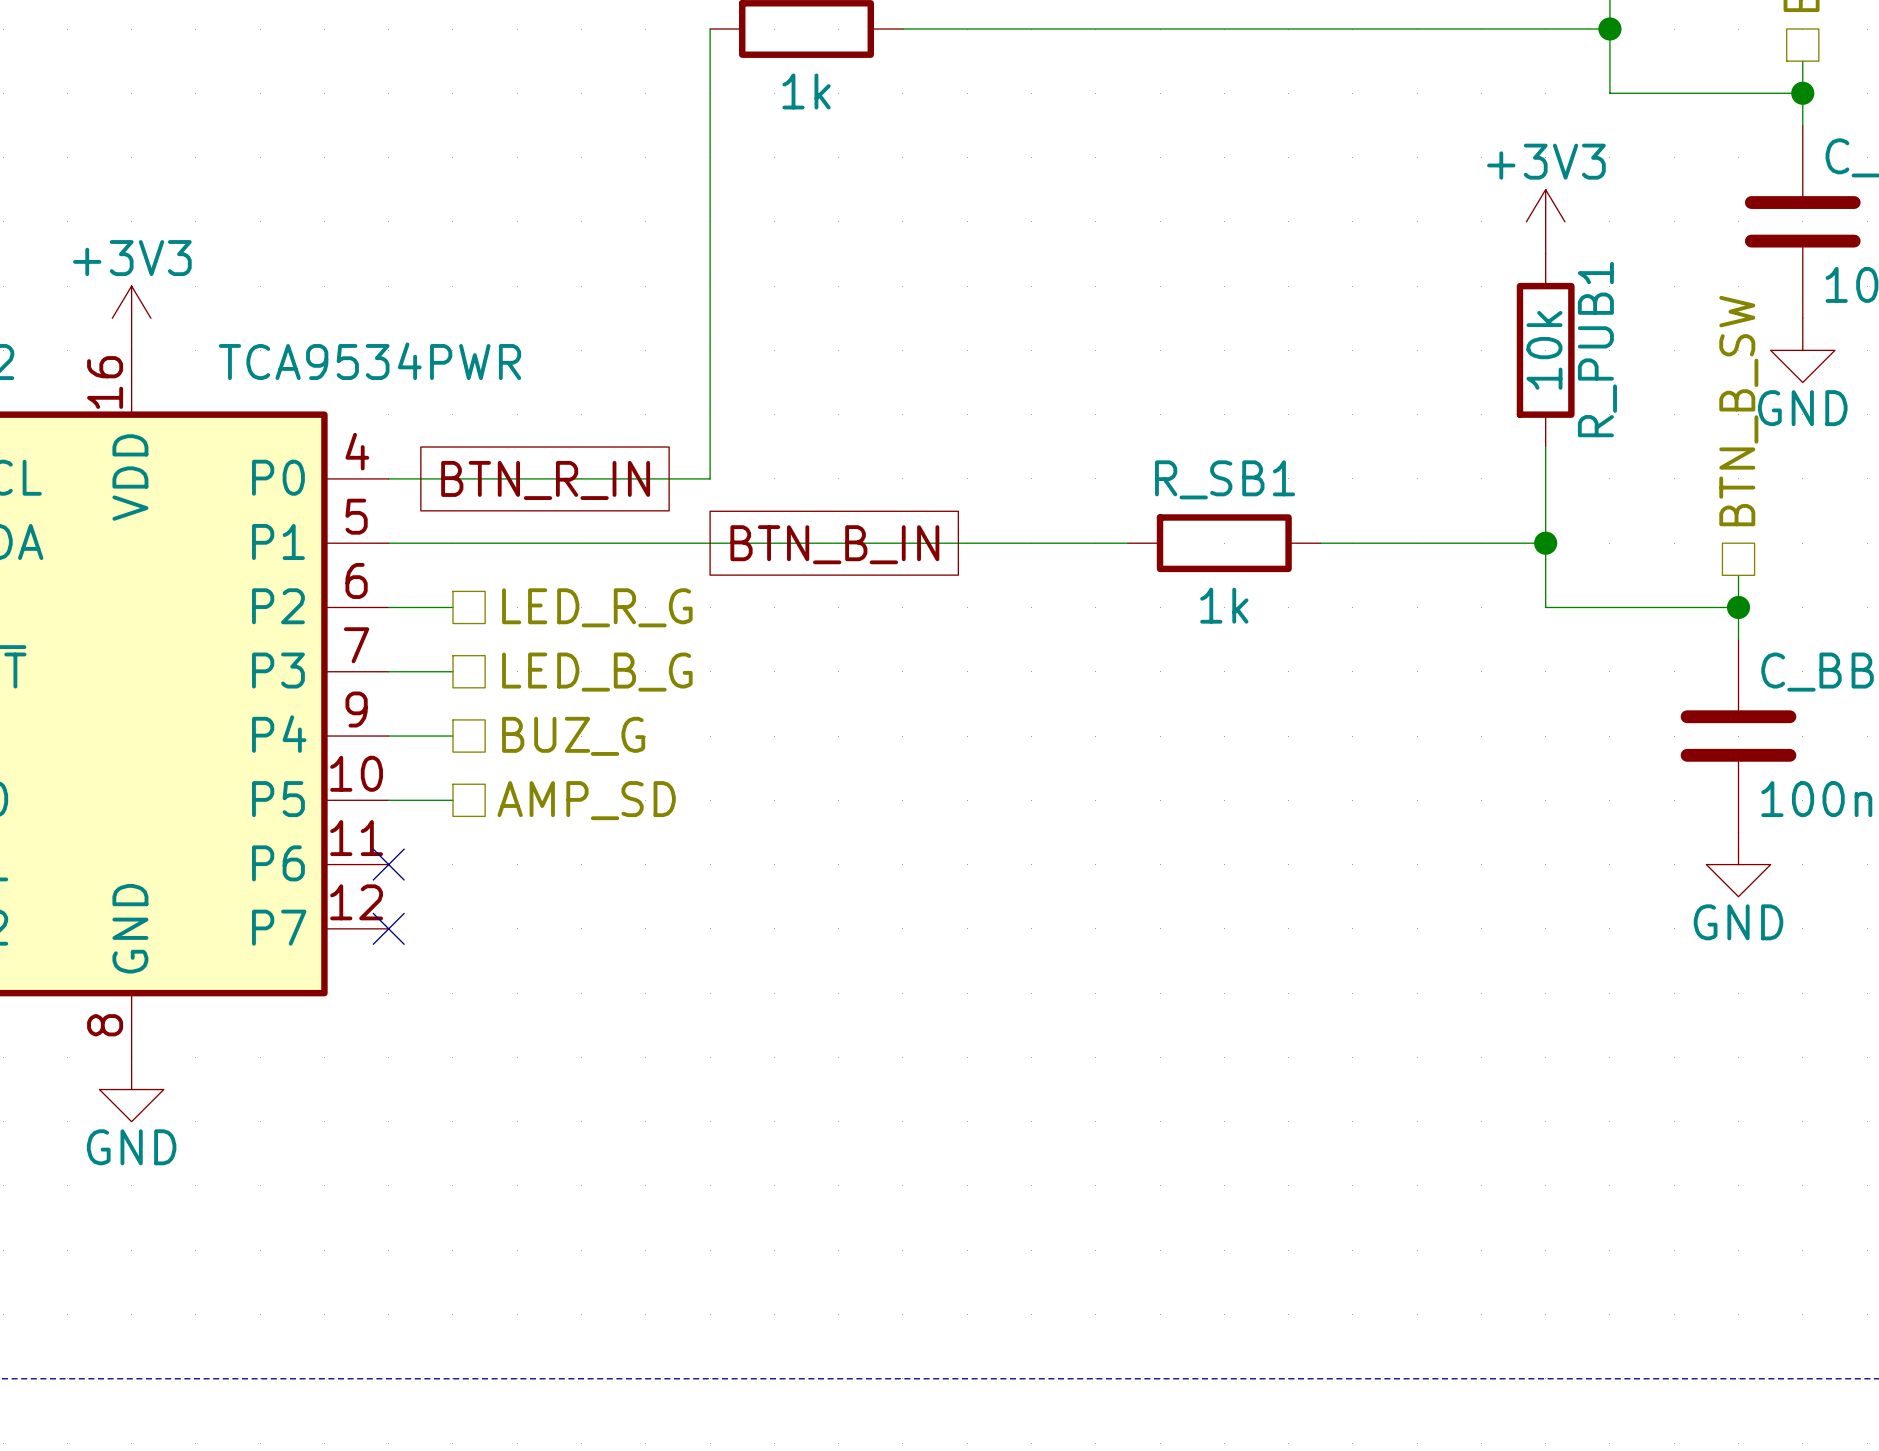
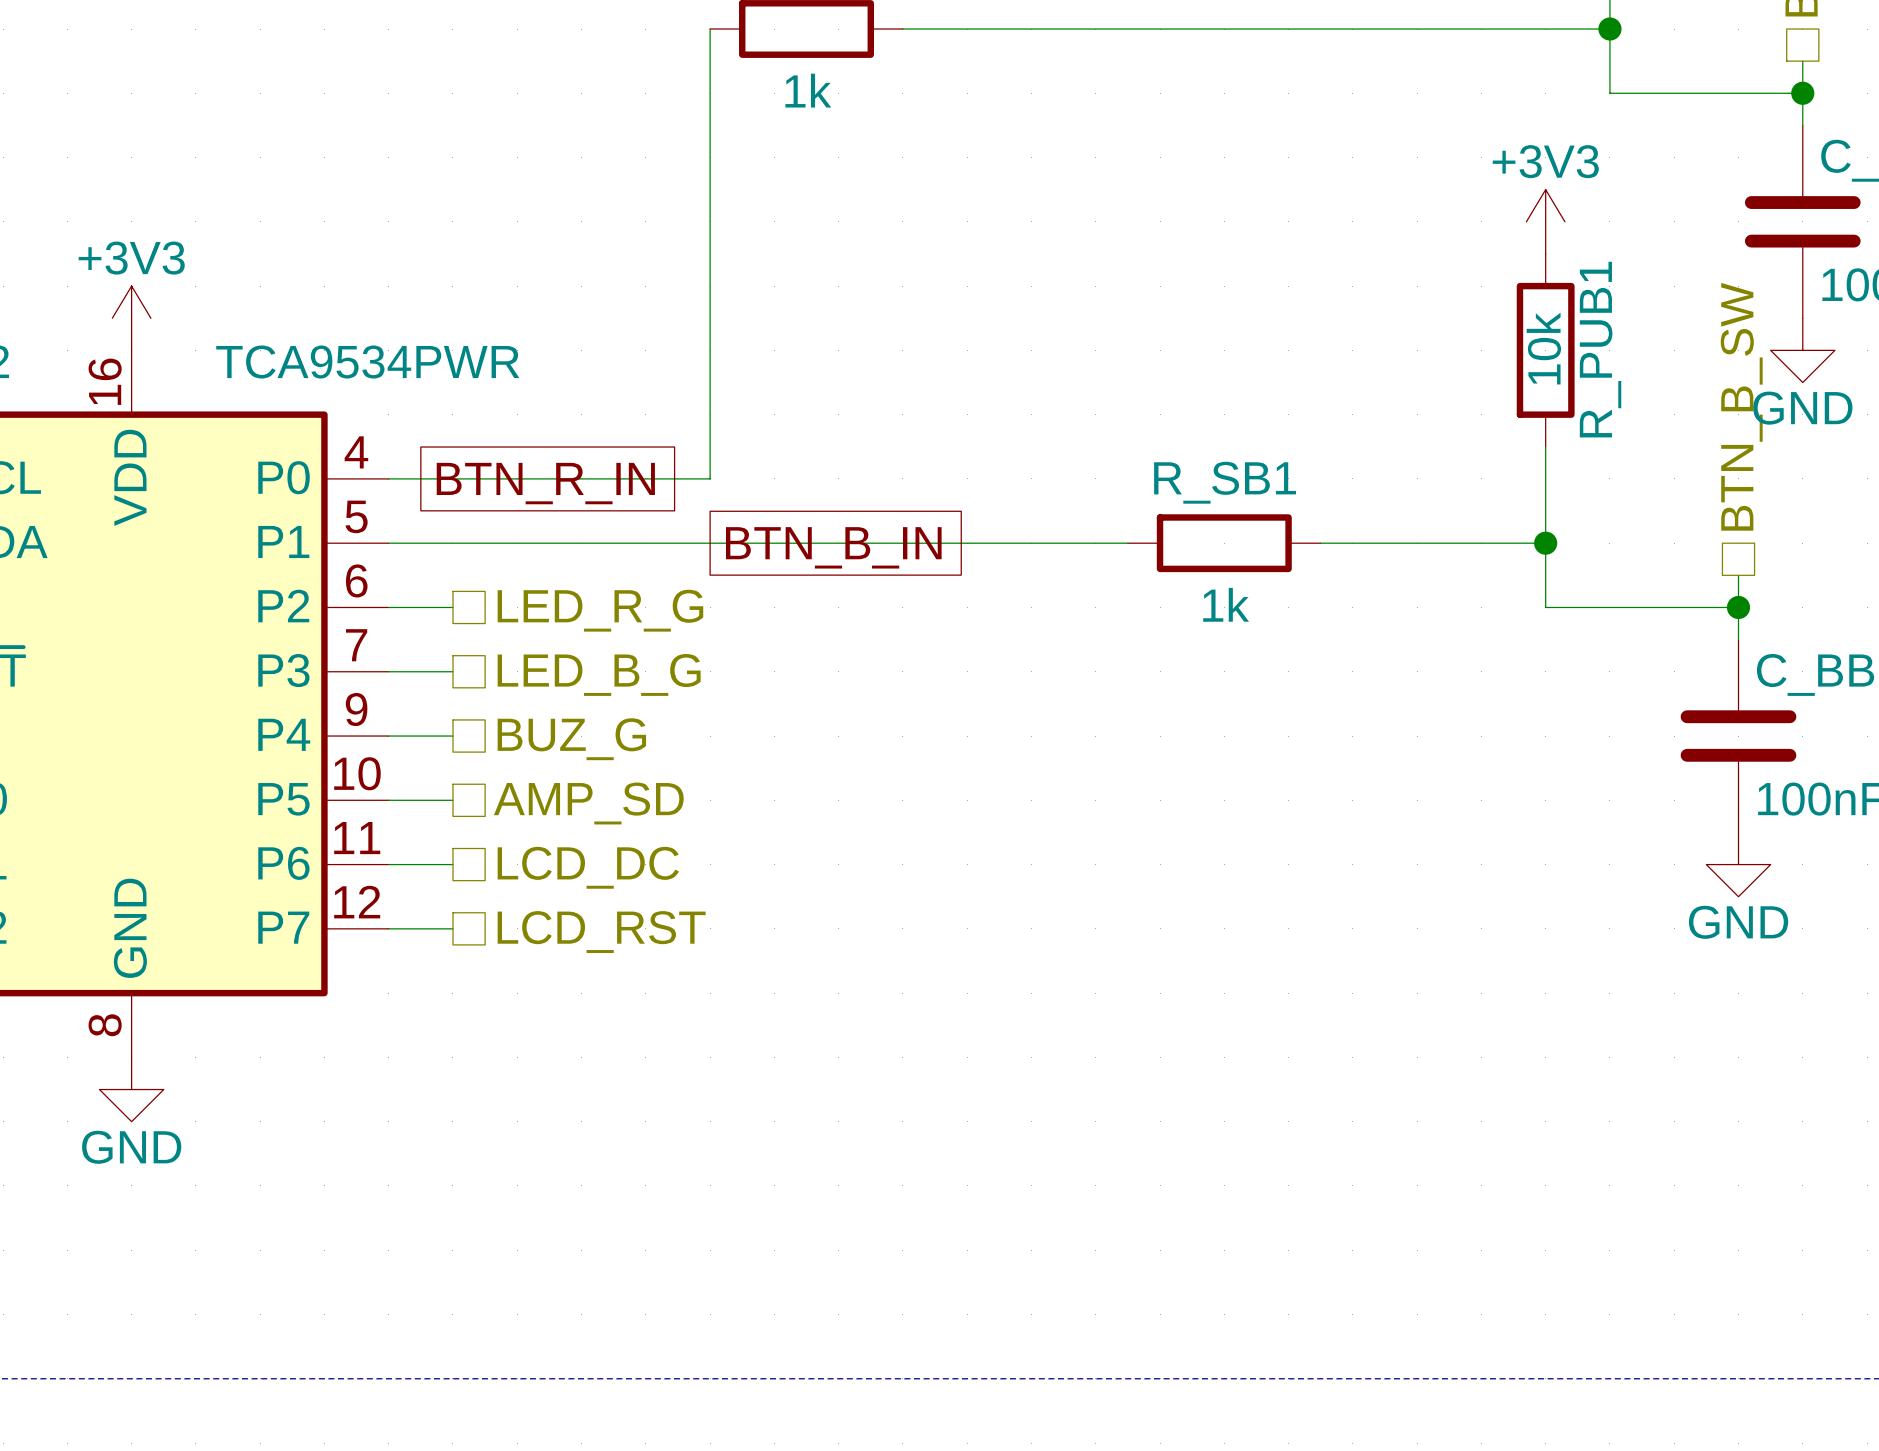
wire: none -> (388, 864) (452, 864)
no-connect mark: (388, 864) -> none
hierarchical label: none -> LCD_DC (588, 867)
wire: none -> (388, 928) (452, 928)
no-connect mark: (388, 928) -> none
hierarchical label: none -> LCD_RST (601, 932)

